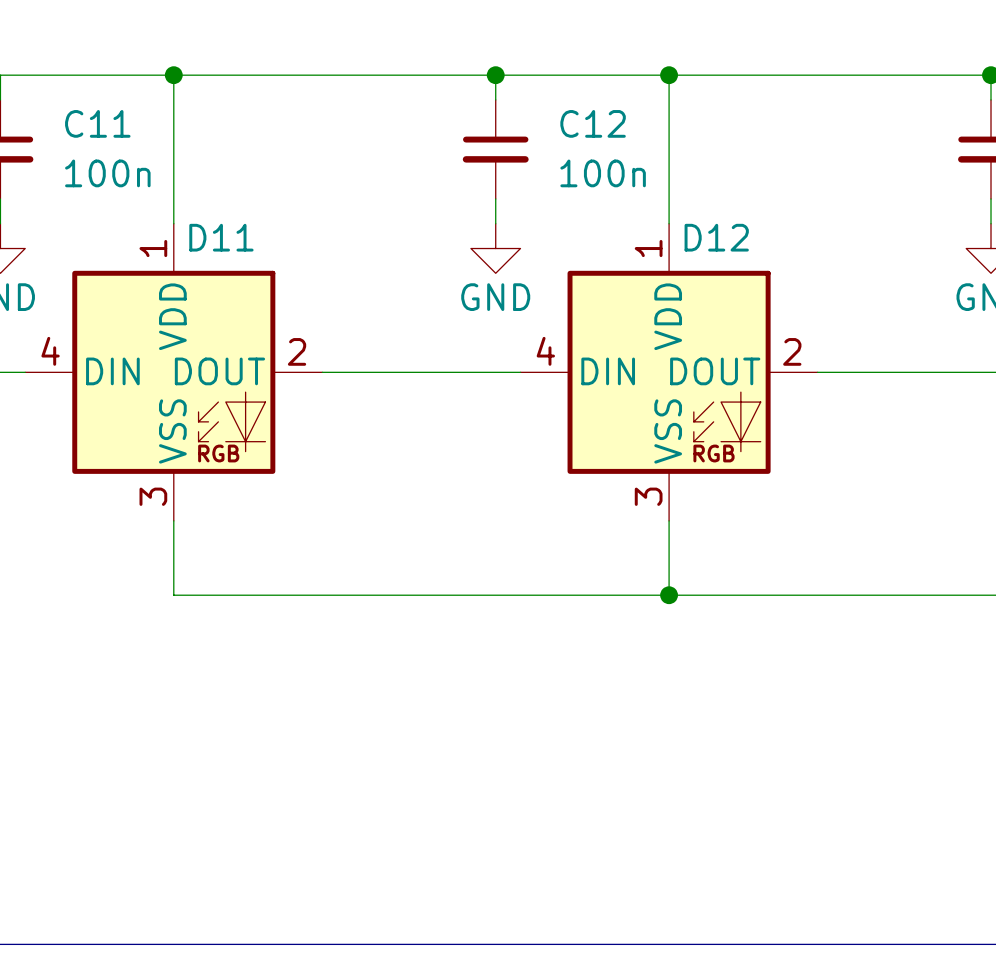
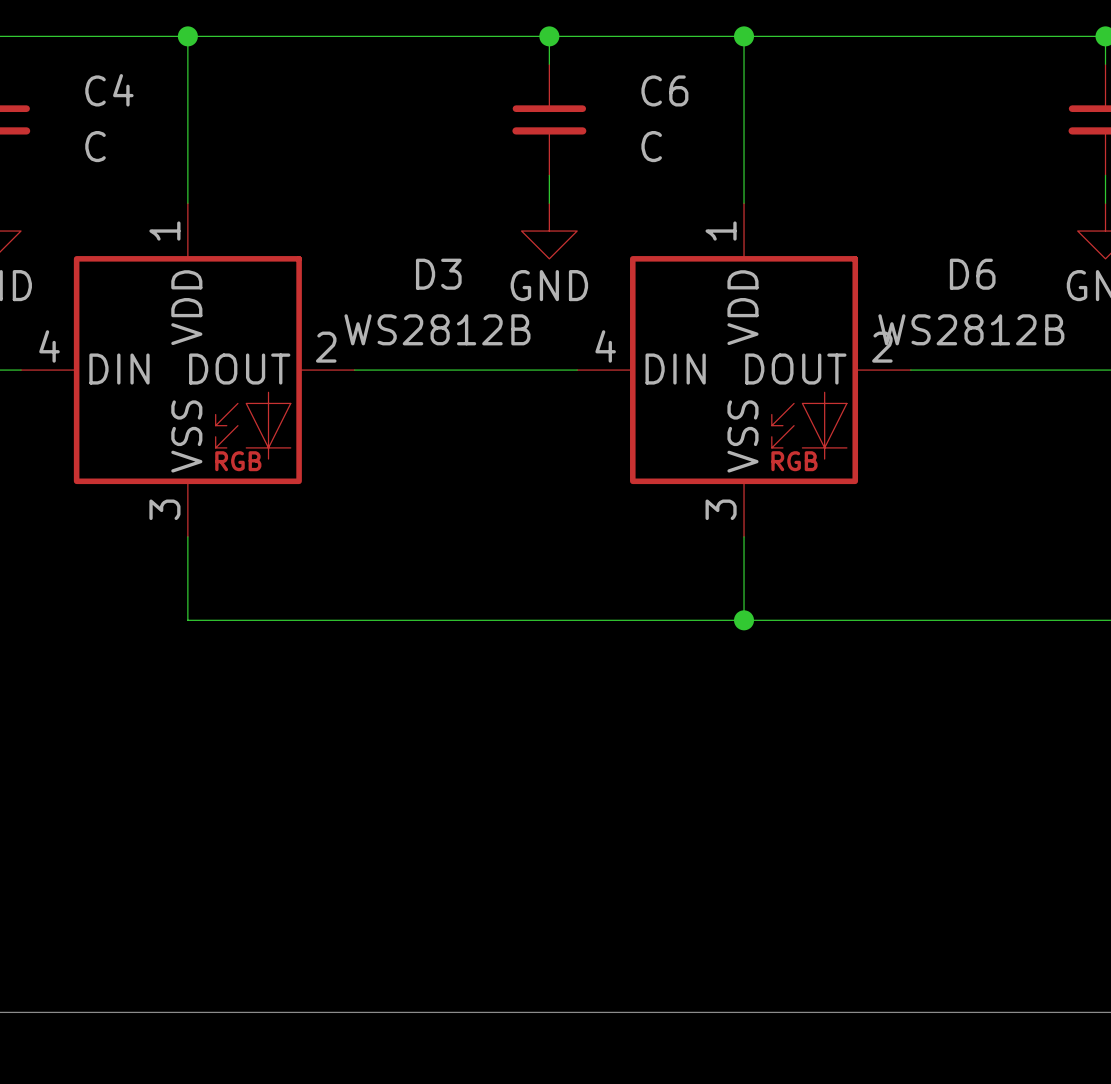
C11 name: C11 (97, 123) -> C4 (109, 90)
C12 name: C12 (593, 123) -> C6 (664, 90)
C11 value: 100n (107, 173) -> C (95, 146)
C12 value: 100n (603, 173) -> C (651, 146)
D11 name: D11 (221, 237) -> D3 (438, 274)
D12 name: D12 (716, 237) -> D6 (972, 274)
D11 value: none -> WS2812B (437, 329)
D12 value: none -> WS2812B (971, 329)

